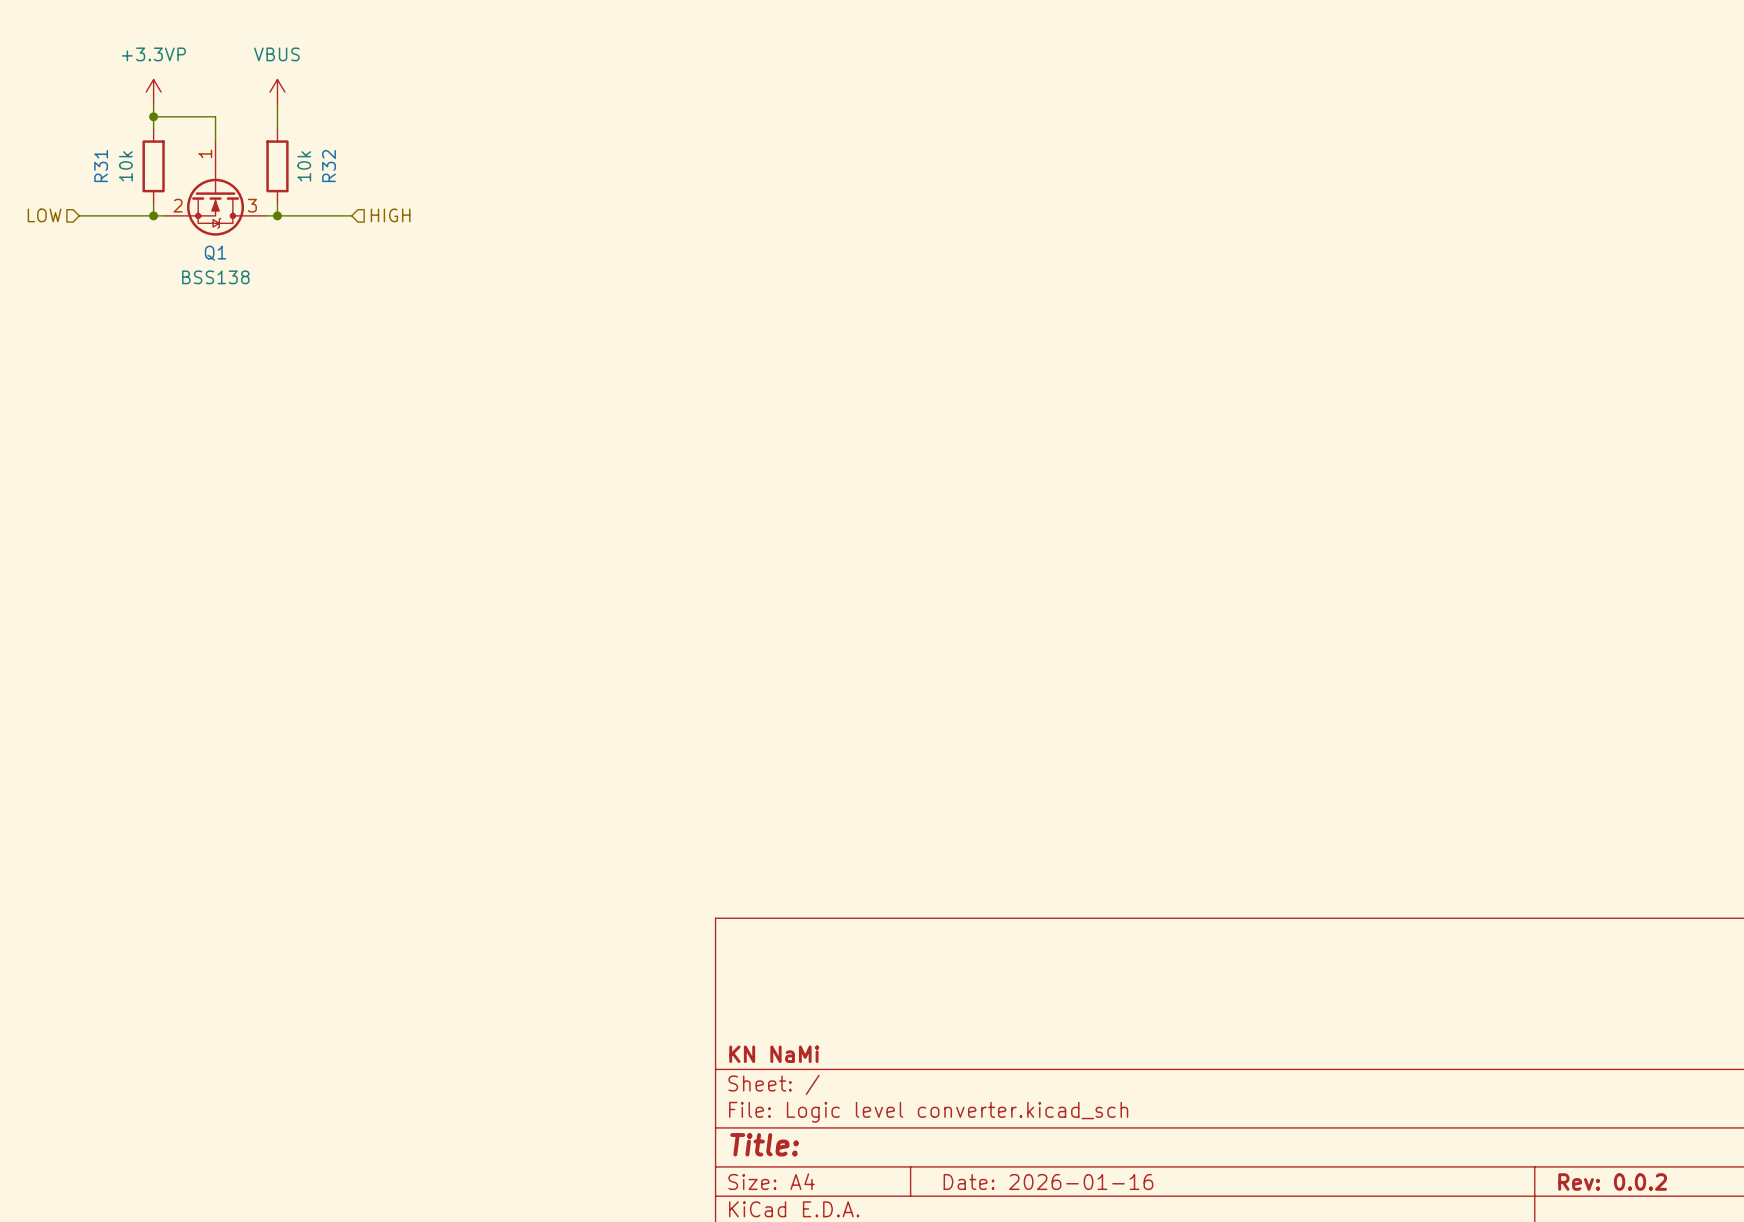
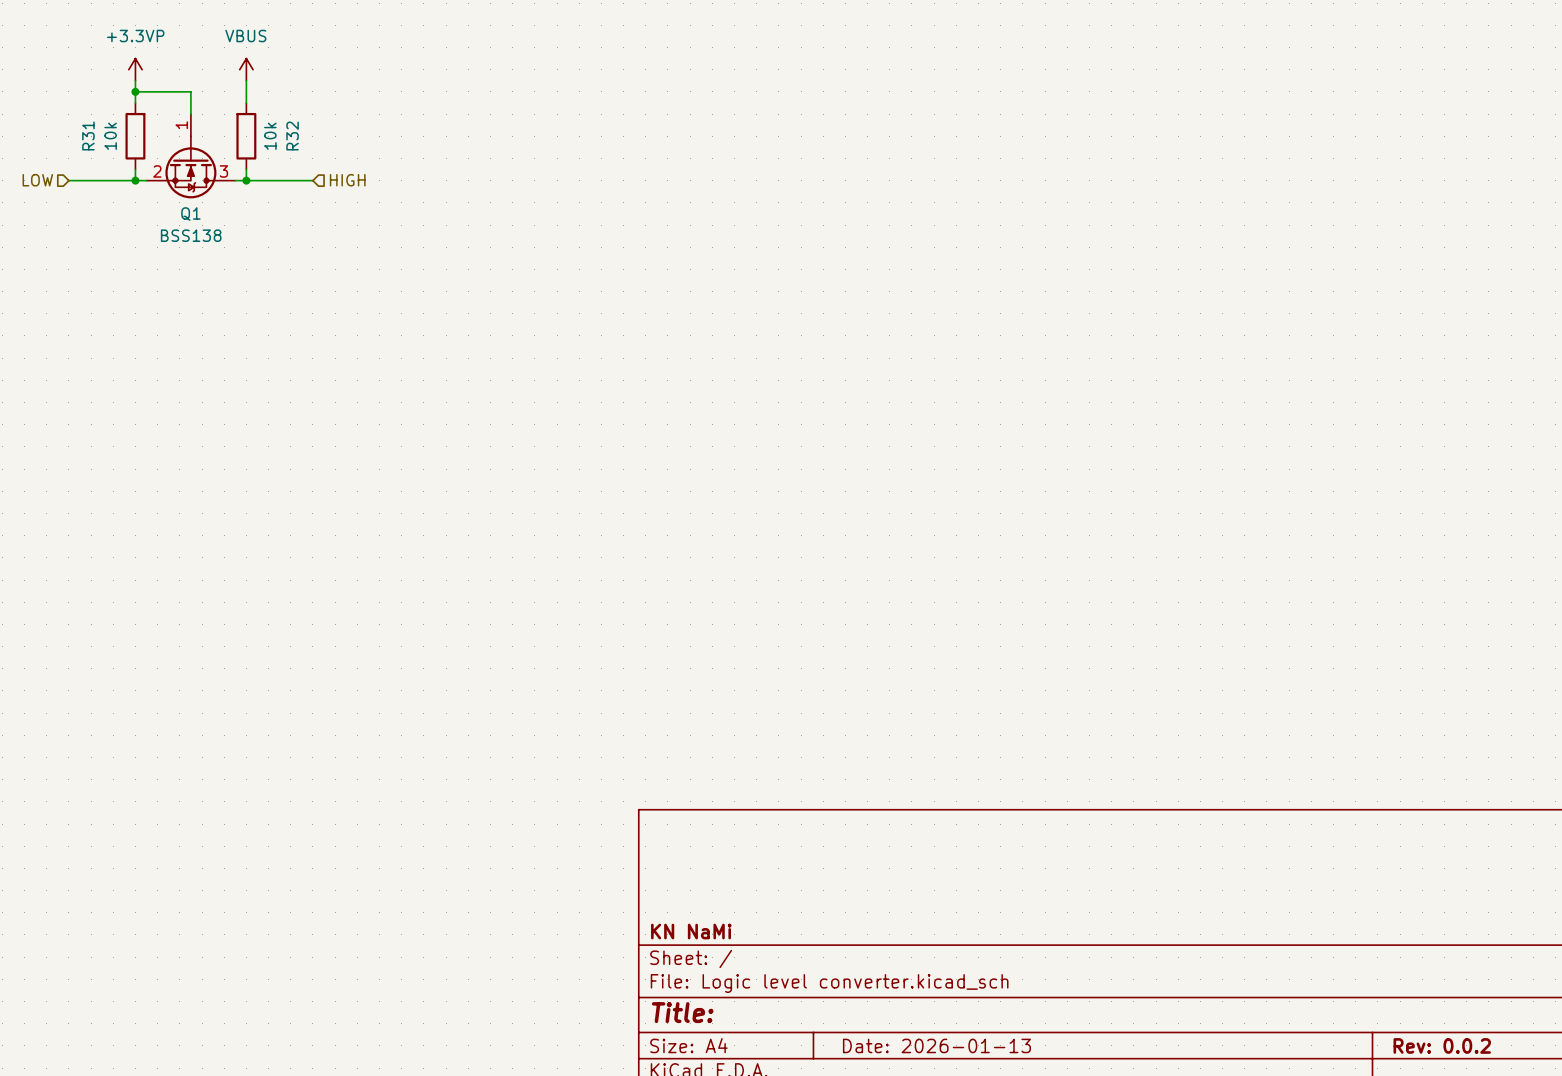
title block: Date: 2026-01-16 (1048, 1182) -> Date: 2026-01-13 (936, 1045)

